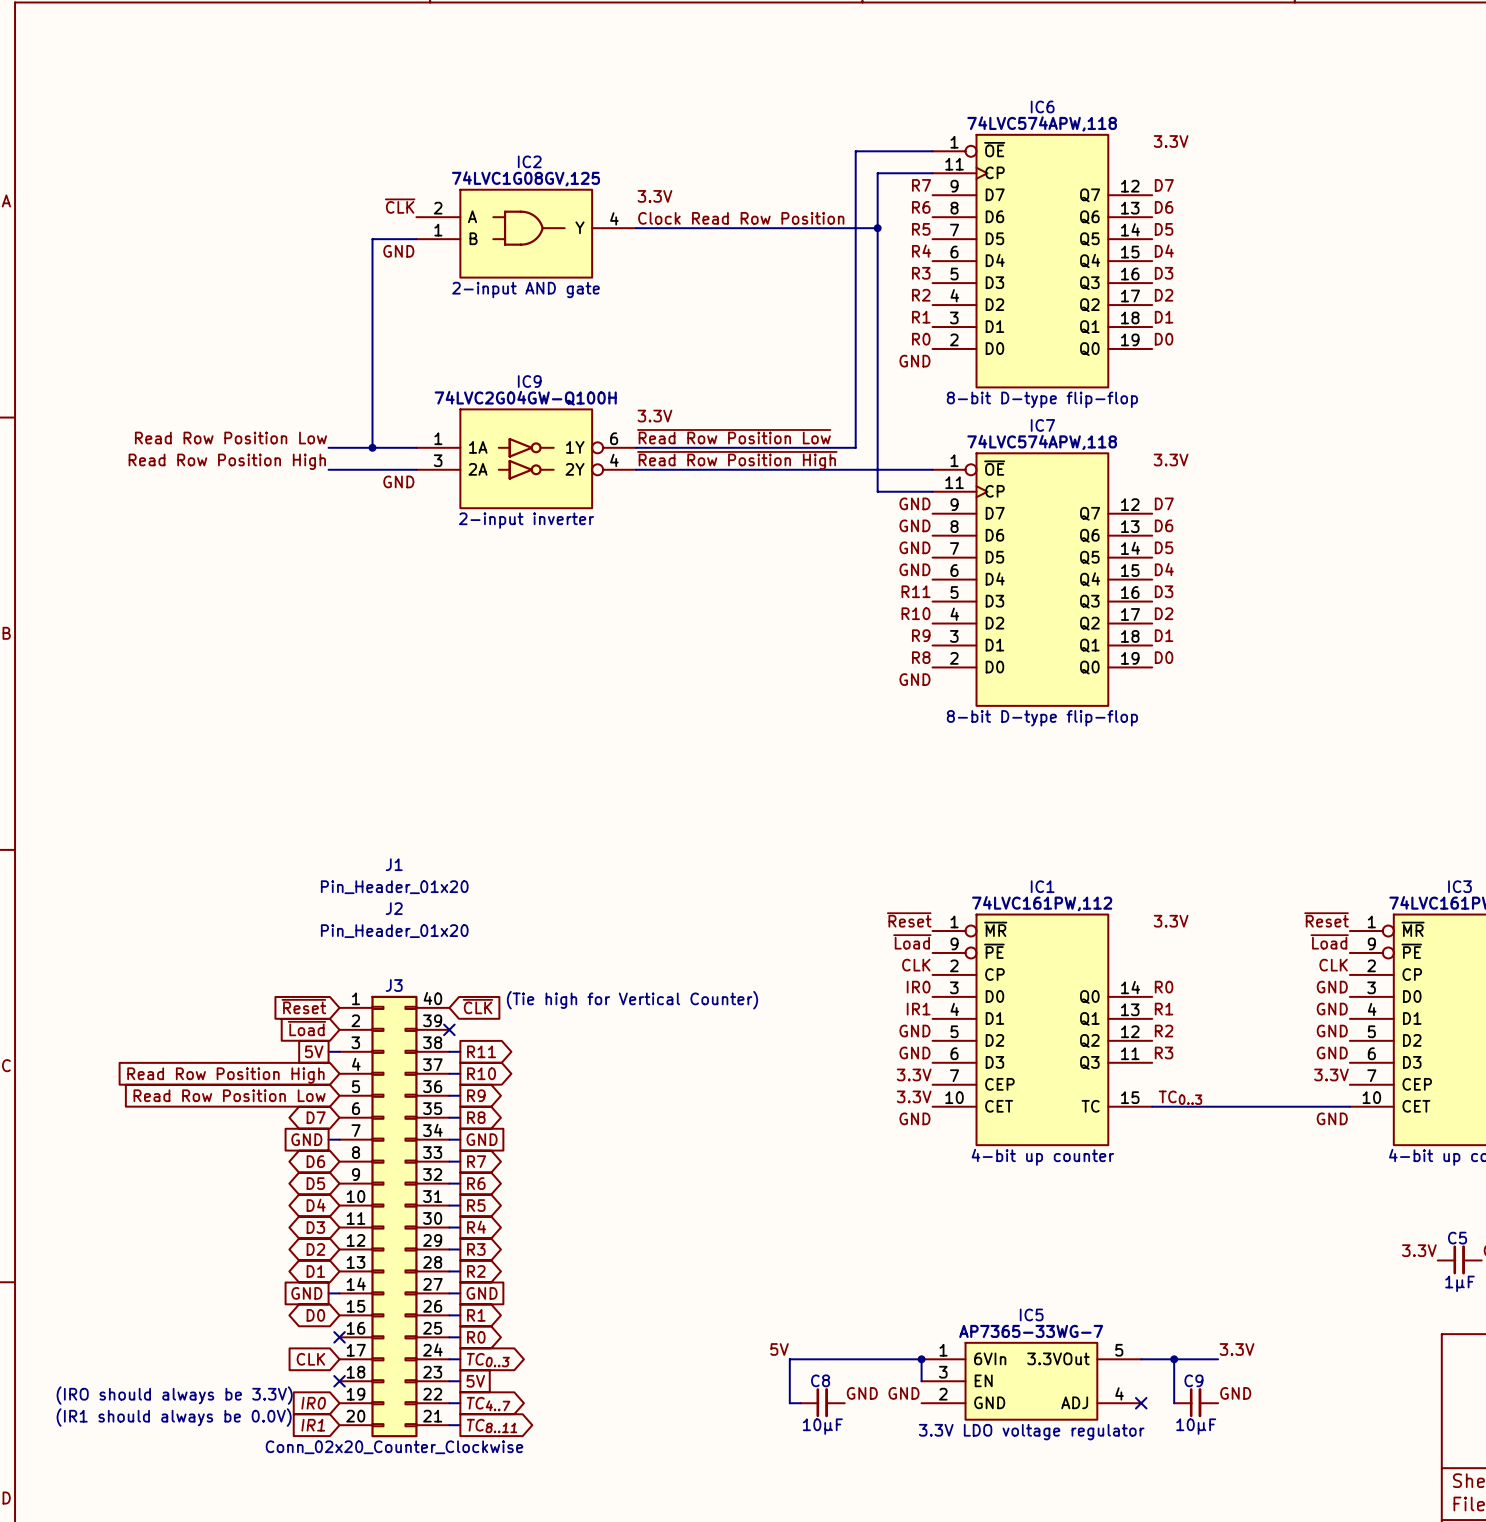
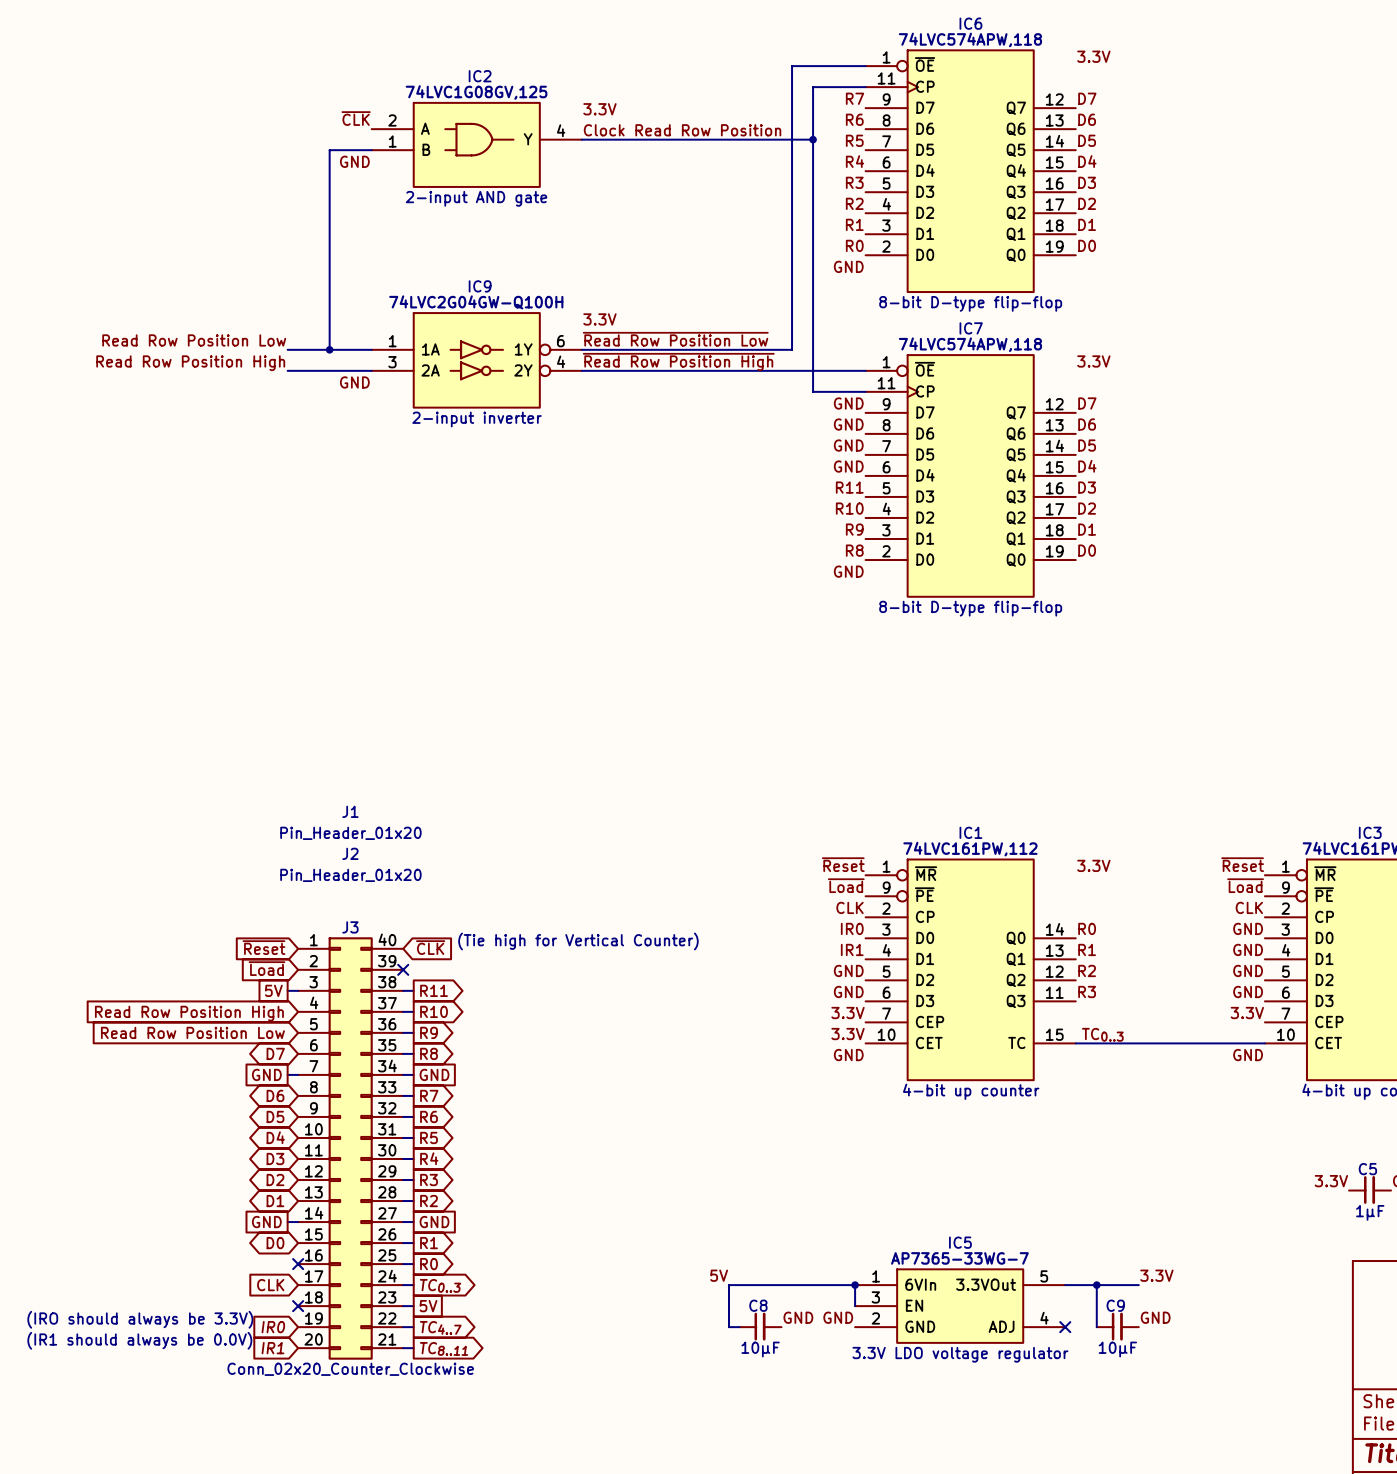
label: none -> 3.3V (1093, 56)
label: none -> R7 (855, 98)
label: none -> D7 (1087, 98)
label: none -> R6 (854, 119)
label: 3.3V (1171, 141) -> D6 (1087, 119)
wire: (855, 151) (932, 151) -> (792, 129) (792, 66) (865, 66)
junction: none -> (813, 139)
label: none -> R5 (854, 140)
label: none -> D5 (1087, 140)
wire: (877, 173) (932, 173) -> (813, 150) (813, 87) (865, 87)
label: R7 (921, 185) -> R4 (855, 161)
label: D7 (1164, 185) -> D4 (1087, 161)
label position: 3.3V (654, 196) -> 3.3V (599, 109)
label position: ~{CLK} (400, 206) -> ~{CLK} (356, 118)
label: R6 (921, 207) -> R3 (854, 182)
label: D6 (1164, 207) -> D3 (1087, 182)
label position: Clock Read Row Position (741, 218) -> Clock Read Row Position (682, 130)
wire: (636, 228) (877, 228) -> (581, 139) (813, 139)
junction: (877, 228) -> none
label: R5 (921, 229) -> R2 (854, 203)
label: D5 (1164, 229) -> D2 (1087, 203)
IC2 position: (526, 233) -> (476, 144)
wire: (372, 239) (416, 239) -> (329, 213) (329, 150) (371, 150)
label position: GND (398, 251) -> GND (354, 161)
label: R4 (921, 251) -> R1 (854, 224)
label: D4 (1164, 251) -> D1 (1087, 224)
IC6 position: (1042, 261) -> (970, 171)
label: R3 (921, 273) -> R0 (854, 245)
label: D3 (1164, 273) -> D0 (1087, 245)
label: R2 (921, 295) -> GND (848, 266)
label: D2 (1164, 295) -> none
label: R1 (921, 317) -> none
label: D1 (1164, 317) -> none
label: R0 (921, 339) -> none
label: D0 (1164, 339) -> none
label: GND (914, 361) -> none
wire: (372, 381) (372, 447) -> none
junction: none -> (329, 349)
wire: (855, 381) (855, 447) (636, 447) -> (792, 349) (581, 349)
label: none -> 3.3V (1093, 361)
label position: 3.3V (654, 416) -> 3.3V (599, 319)
wire: (877, 425) (877, 491) (932, 491) -> (813, 391) (865, 391)
label position: ~{Read Row Position Low} (734, 436) -> ~{Read Row Position Low} (675, 339)
label position: Read Row Position Low (230, 438) -> Read Row Position Low (194, 340)
label: none -> GND (848, 403)
label: none -> D7 (1087, 403)
wire: (328, 447) (416, 447) -> (287, 349) (371, 349)
junction: (372, 447) -> none
IC9 position: (526, 458) -> (476, 360)
label: none -> GND (848, 424)
label: 3.3V (1171, 459) -> D6 (1087, 424)
label position: ~{Read Row Position High} (737, 460) -> ~{Read Row Position High} (678, 362)
label position: Read Row Position High (227, 461) -> Read Row Position High (190, 363)
wire: (328, 469) (416, 469) -> (287, 370) (371, 370)
wire: (636, 469) (932, 469) -> (581, 370) (865, 370)
label position: GND (398, 481) -> GND (354, 382)
label: none -> GND (848, 445)
label: none -> D5 (1087, 445)
label: D7 (1164, 503) -> D4 (1087, 466)
label: GND (914, 525) -> R11 (849, 487)
label: D6 (1164, 525) -> D3 (1087, 487)
label: GND (914, 547) -> R10 (849, 508)
label: D5 (1164, 547) -> D2 (1087, 508)
label: GND (914, 569) -> R9 (854, 529)
label: D4 (1164, 569) -> D1 (1087, 529)
IC7 position: (1042, 579) -> (970, 475)
label: R11 (916, 591) -> R8 (854, 550)
label: D3 (1164, 591) -> D0 (1087, 550)
label: R10 (916, 613) -> GND (848, 571)
label: D2 (1164, 613) -> none
label: R9 (921, 635) -> none
label: D1 (1164, 635) -> none
label: R8 (921, 657) -> none
label: D0 (1164, 657) -> none
label: GND (914, 679) -> none

